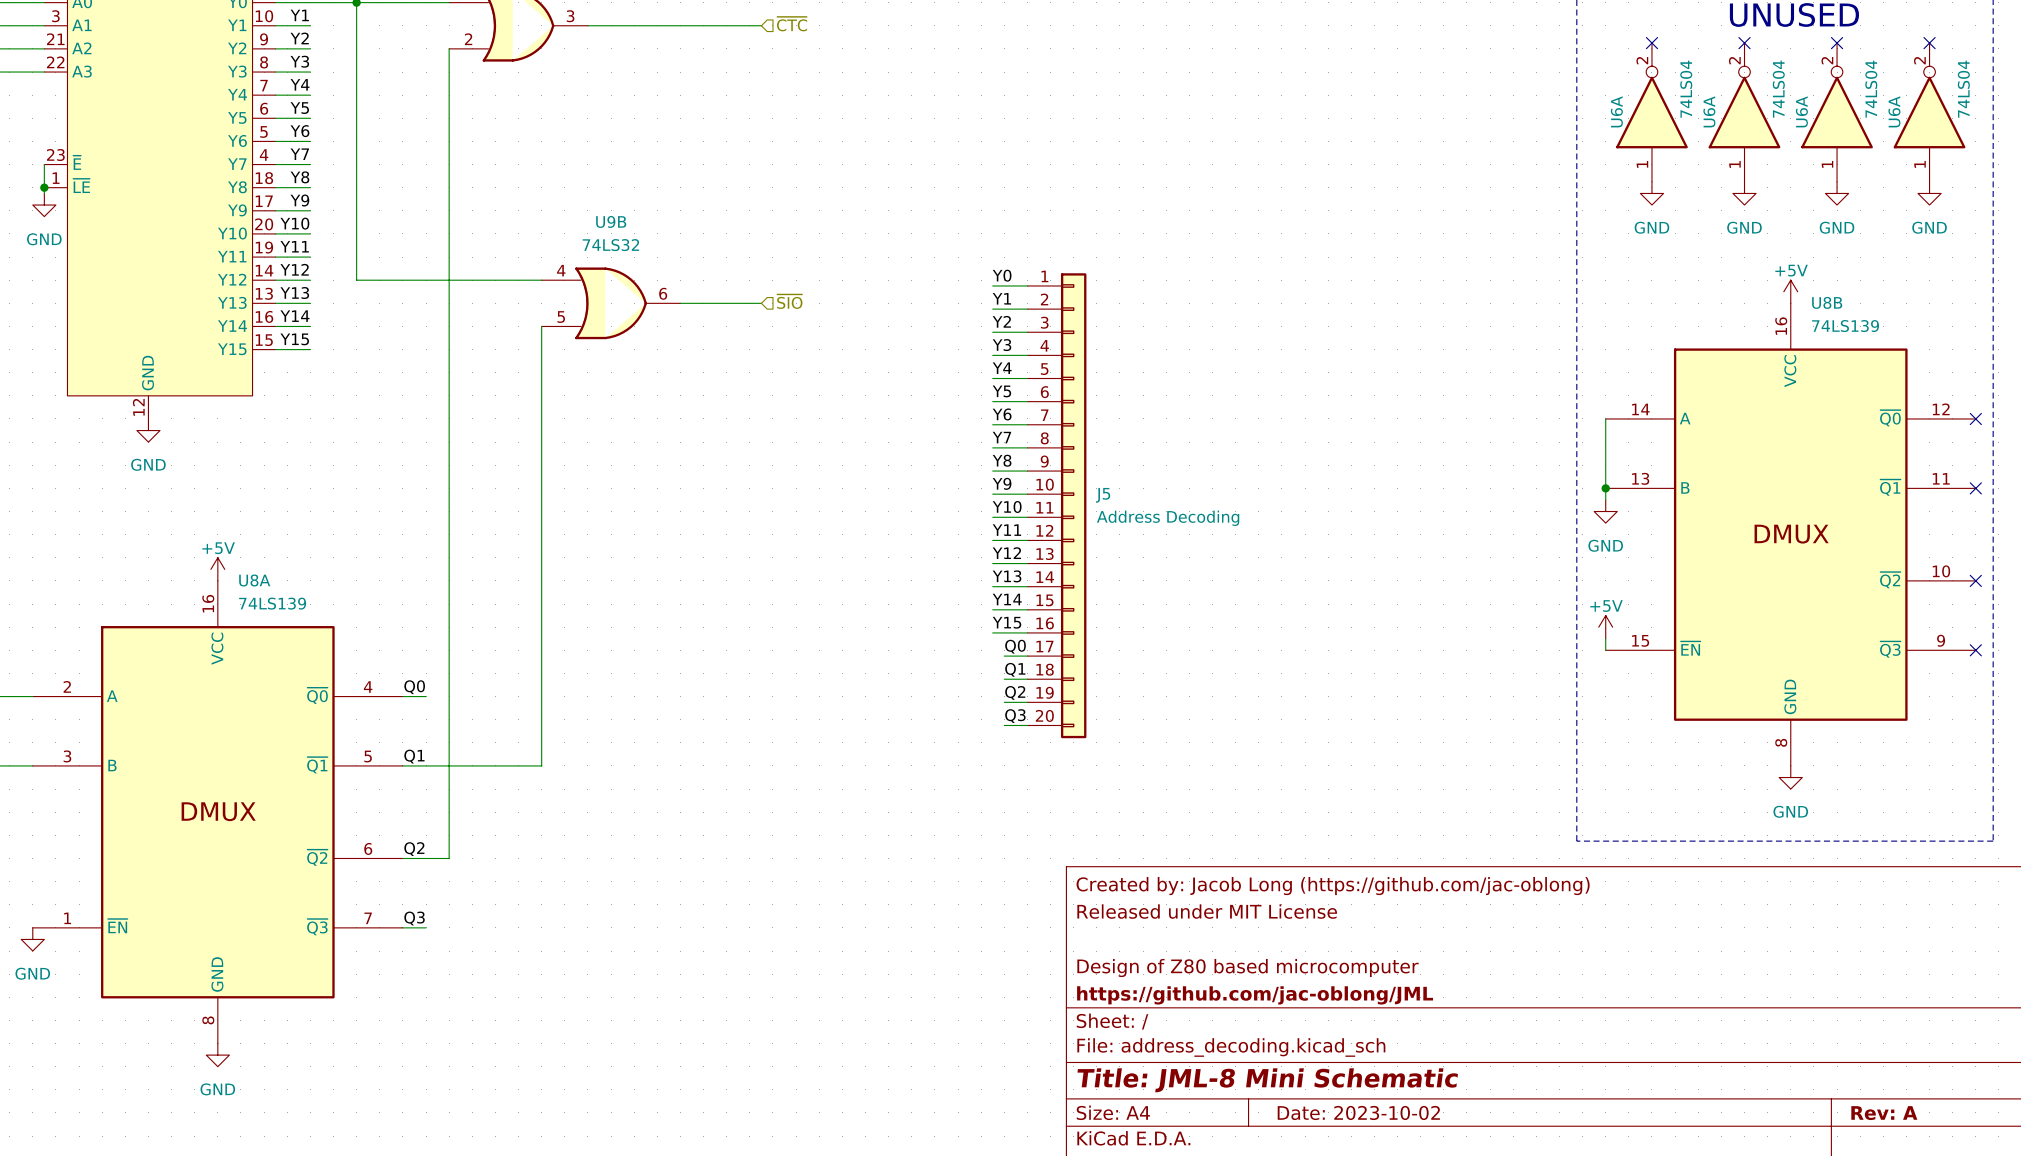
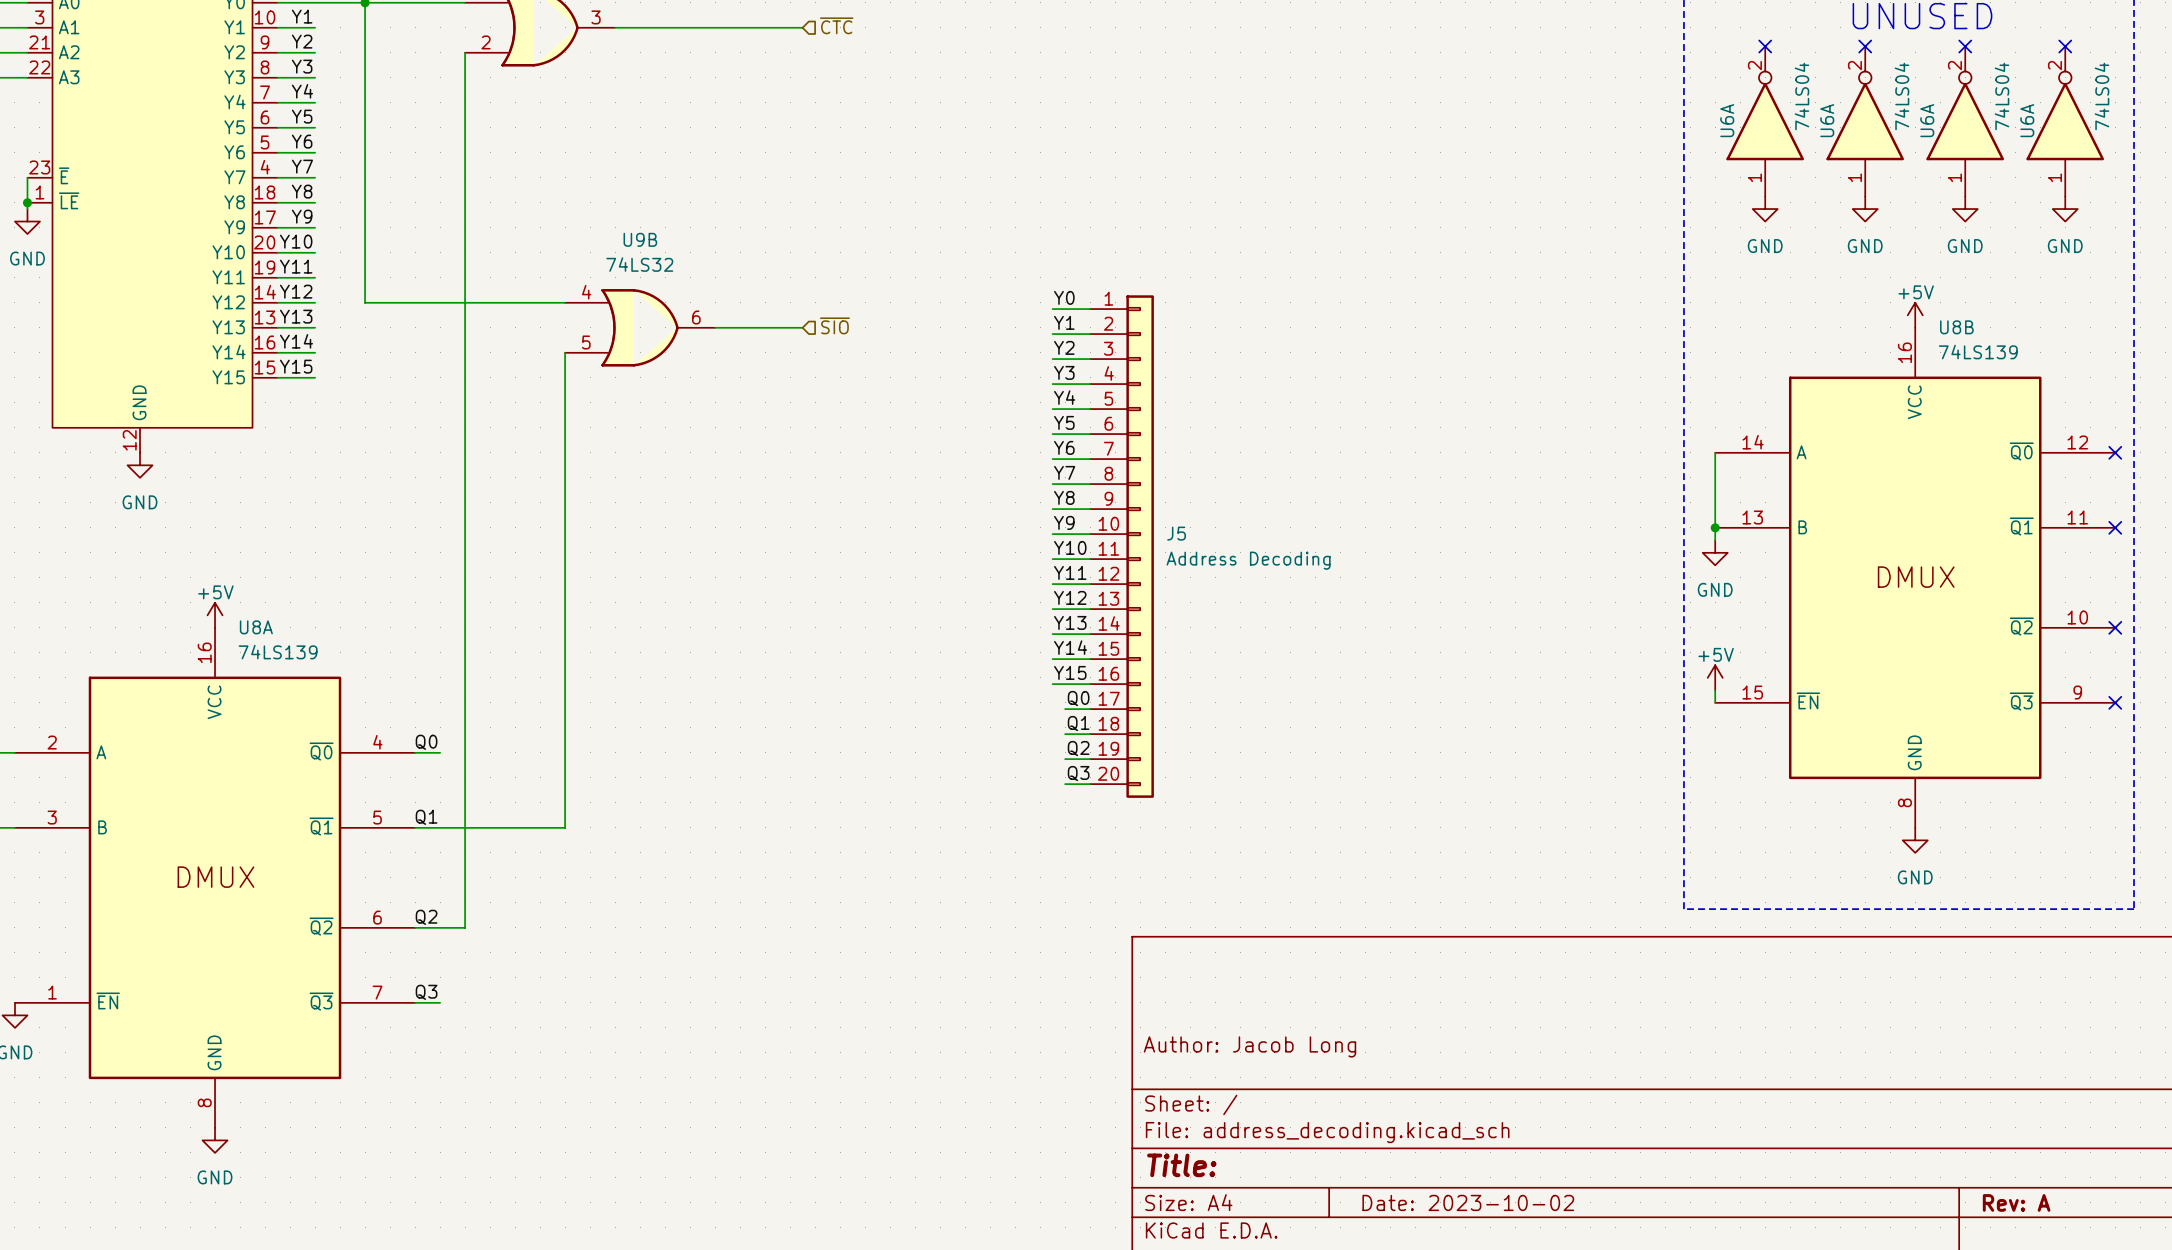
title block: Created by: Jacob Long (https://github.com/jac-oblong) (1333, 886) -> none
title block: Released under MIT License (1207, 911) -> none
title block: Design of Z80 based microcomputer (1247, 968) -> Author: Jacob Long (1249, 1046)
title block: https://github.com/jac-oblong/JML (1255, 995) -> none
title block: Title: JML-8 Mini Schematic (1267, 1080) -> Title: (1181, 1165)

